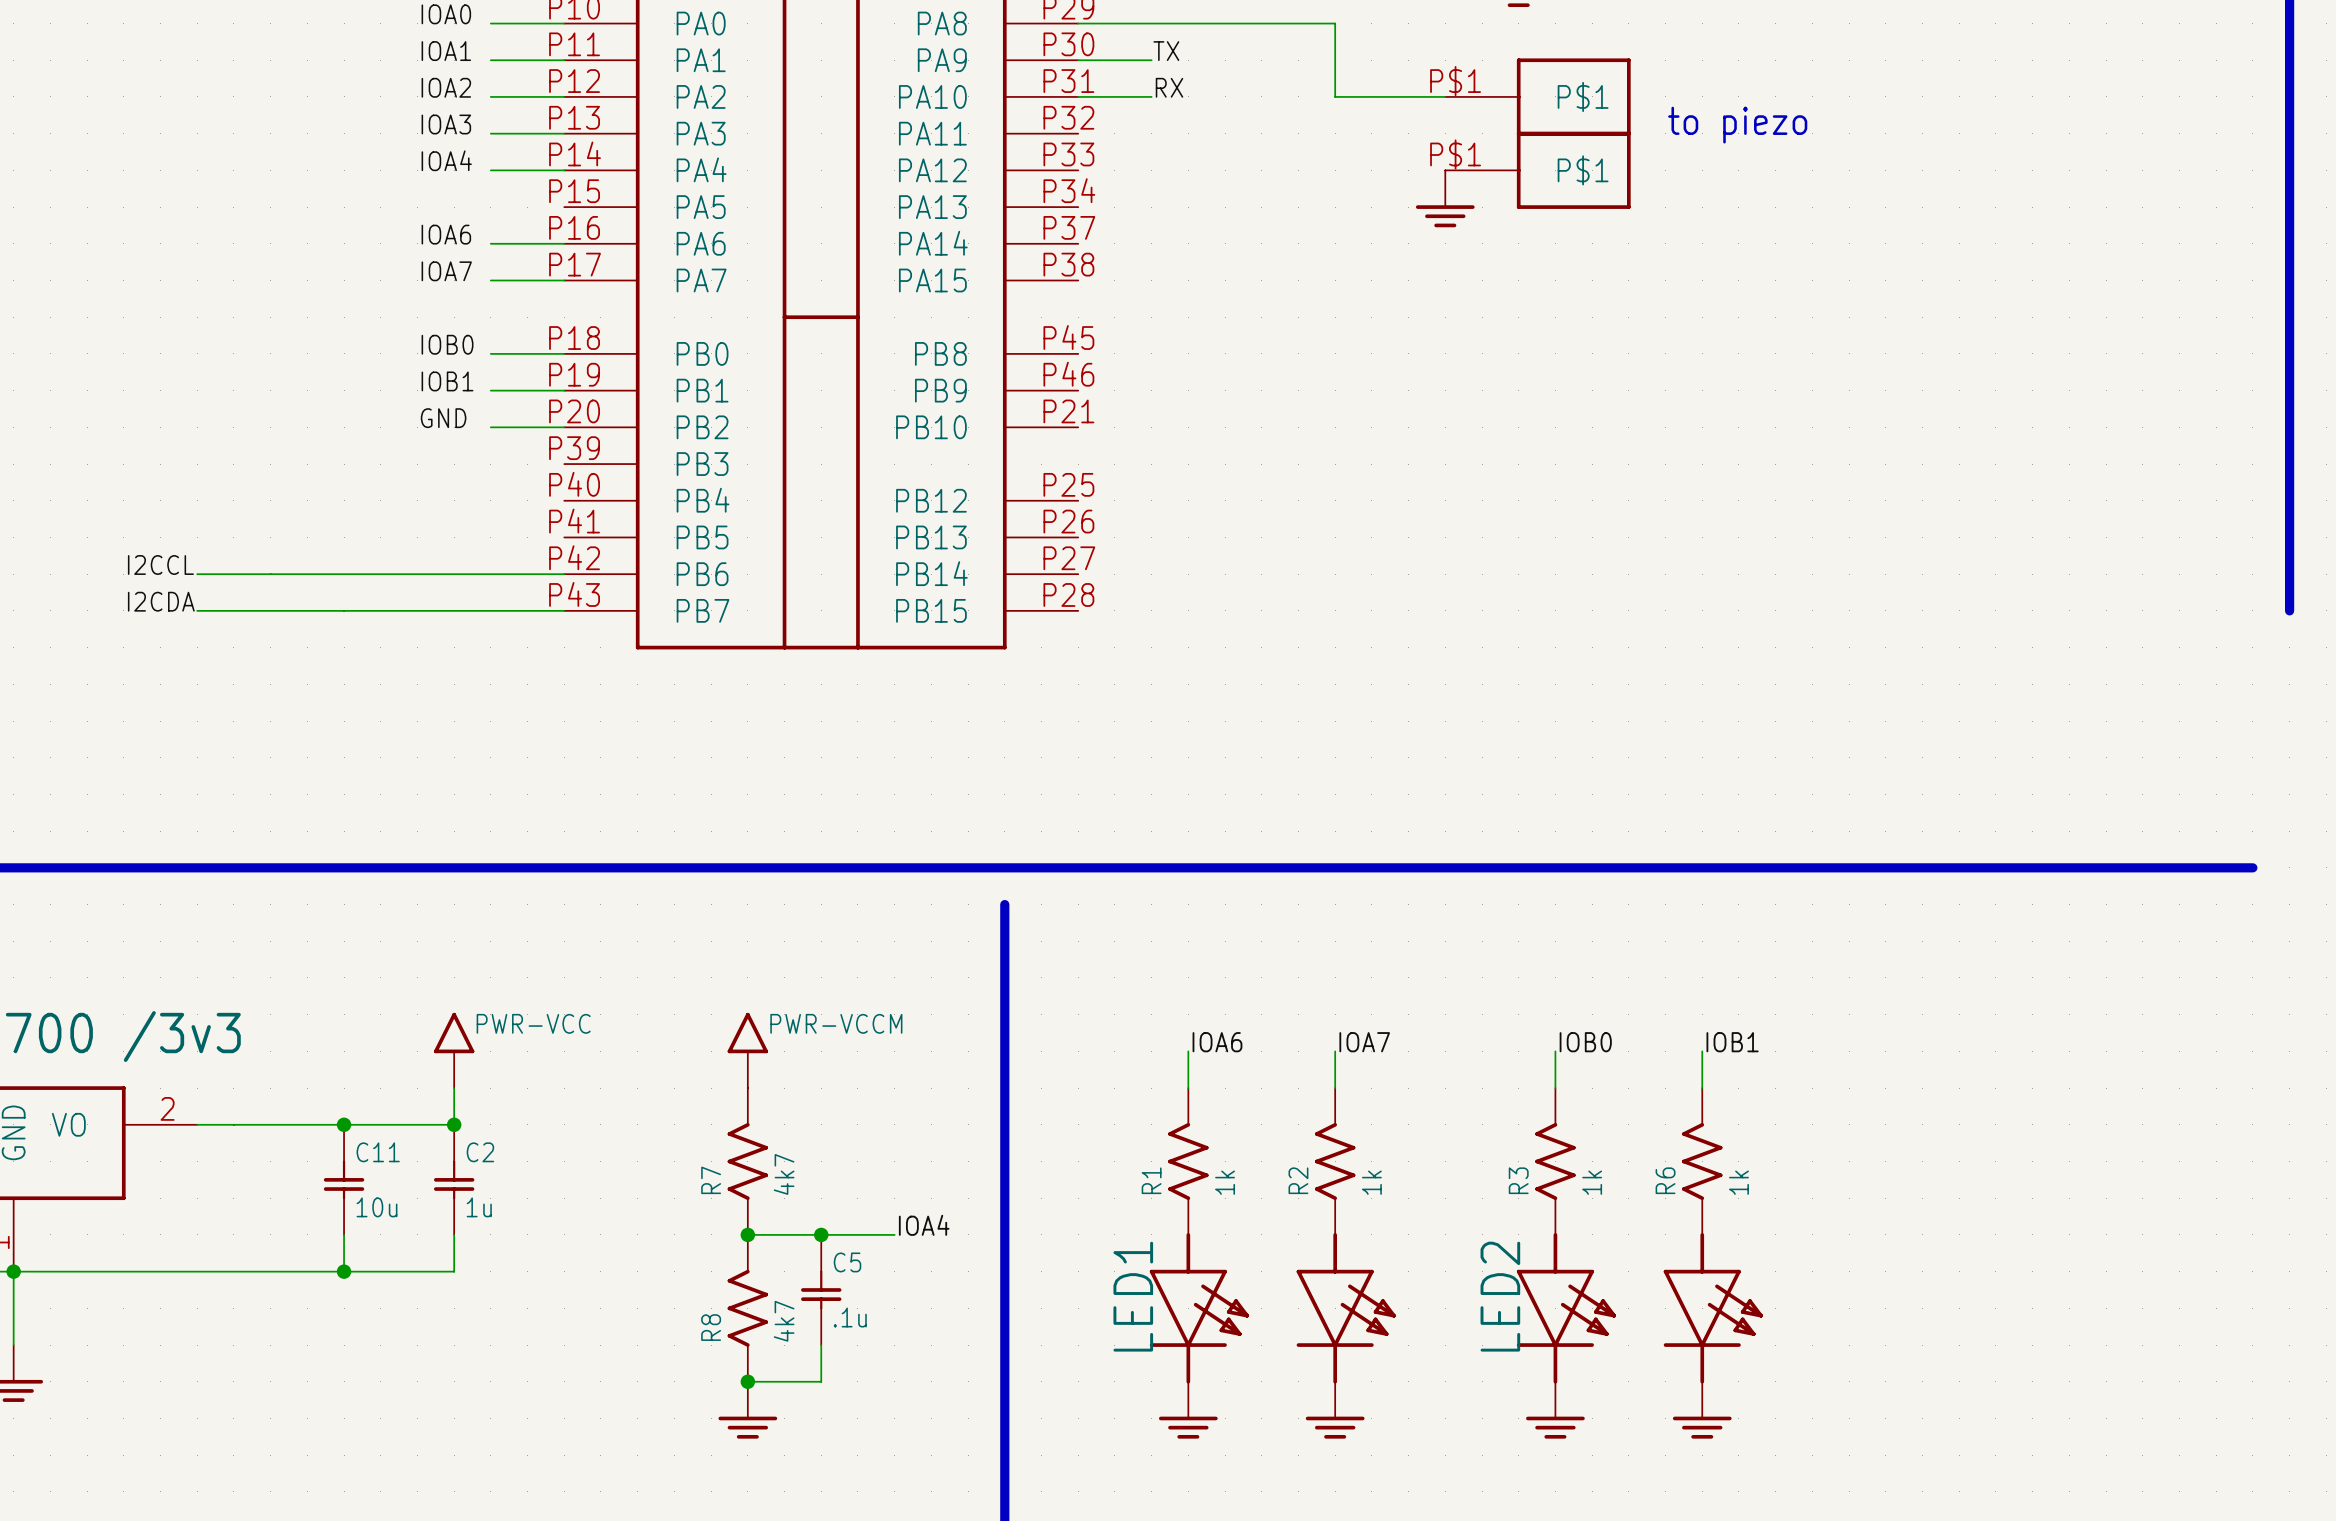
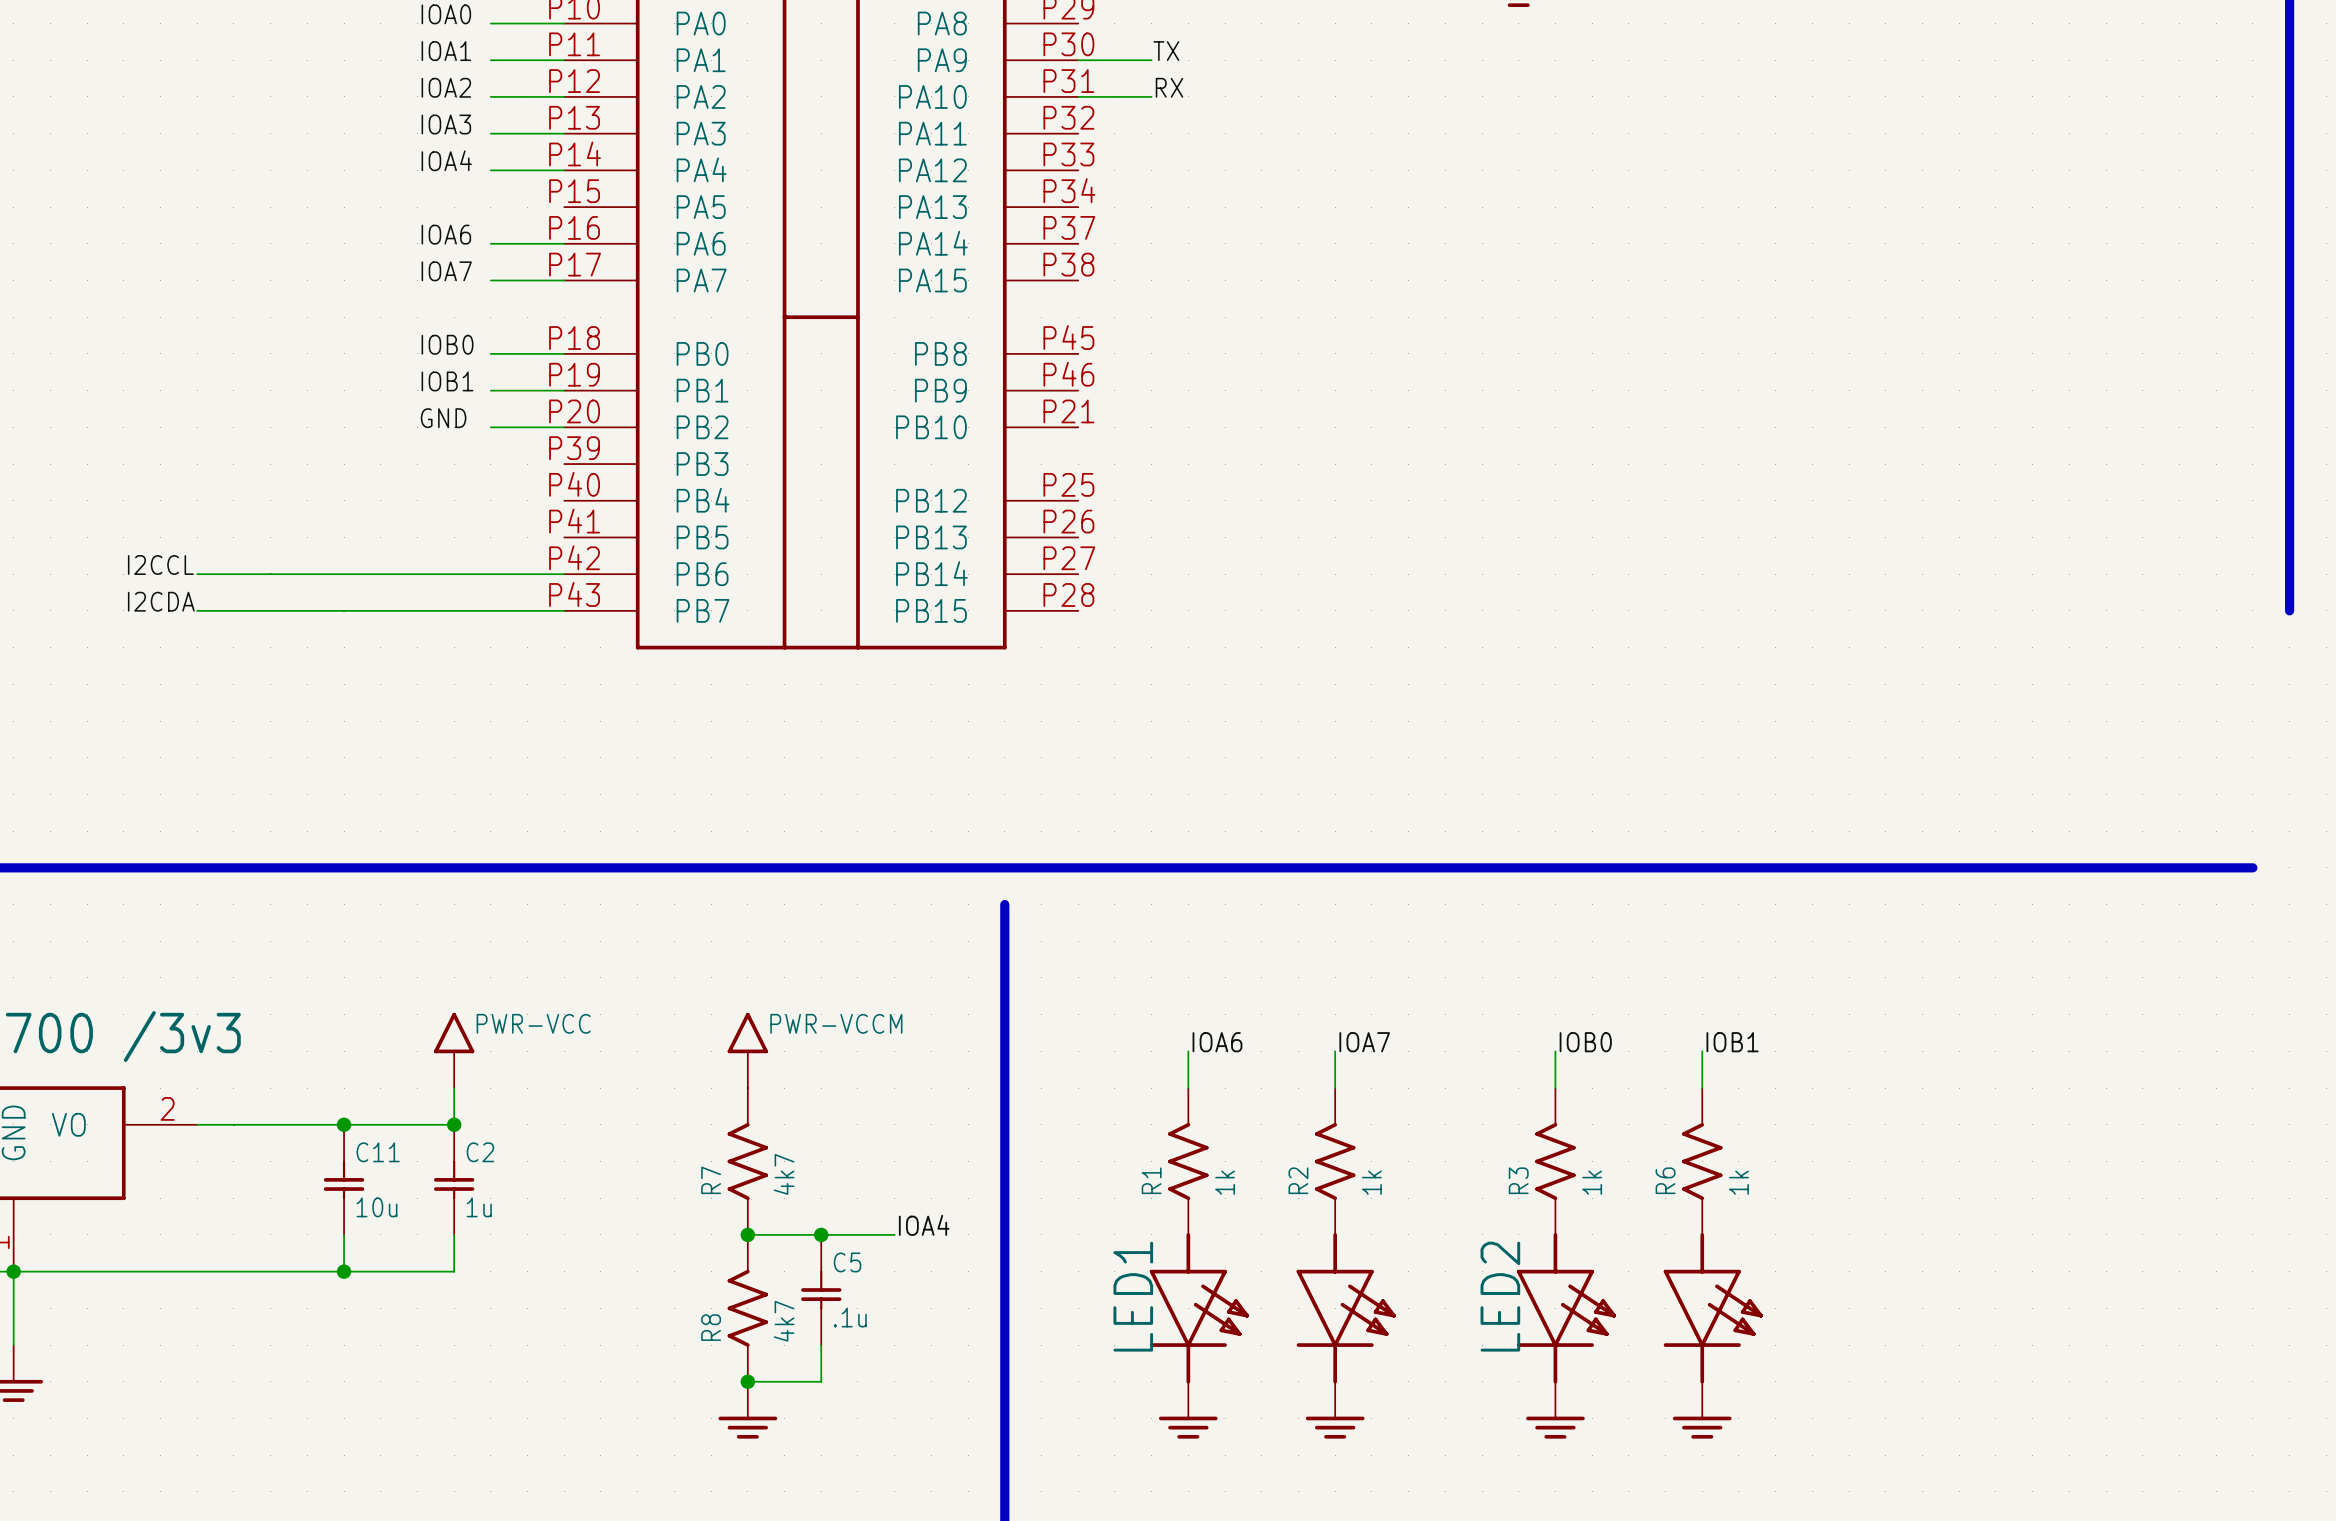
wire: (1078, 23) (1335, 23) (1335, 96) (1445, 96) -> none
part: (1537, 96) -> none
text: to piezo (1737, 125) -> none
part: (1537, 170) -> none
power symbol: (1445, 198) -> none

